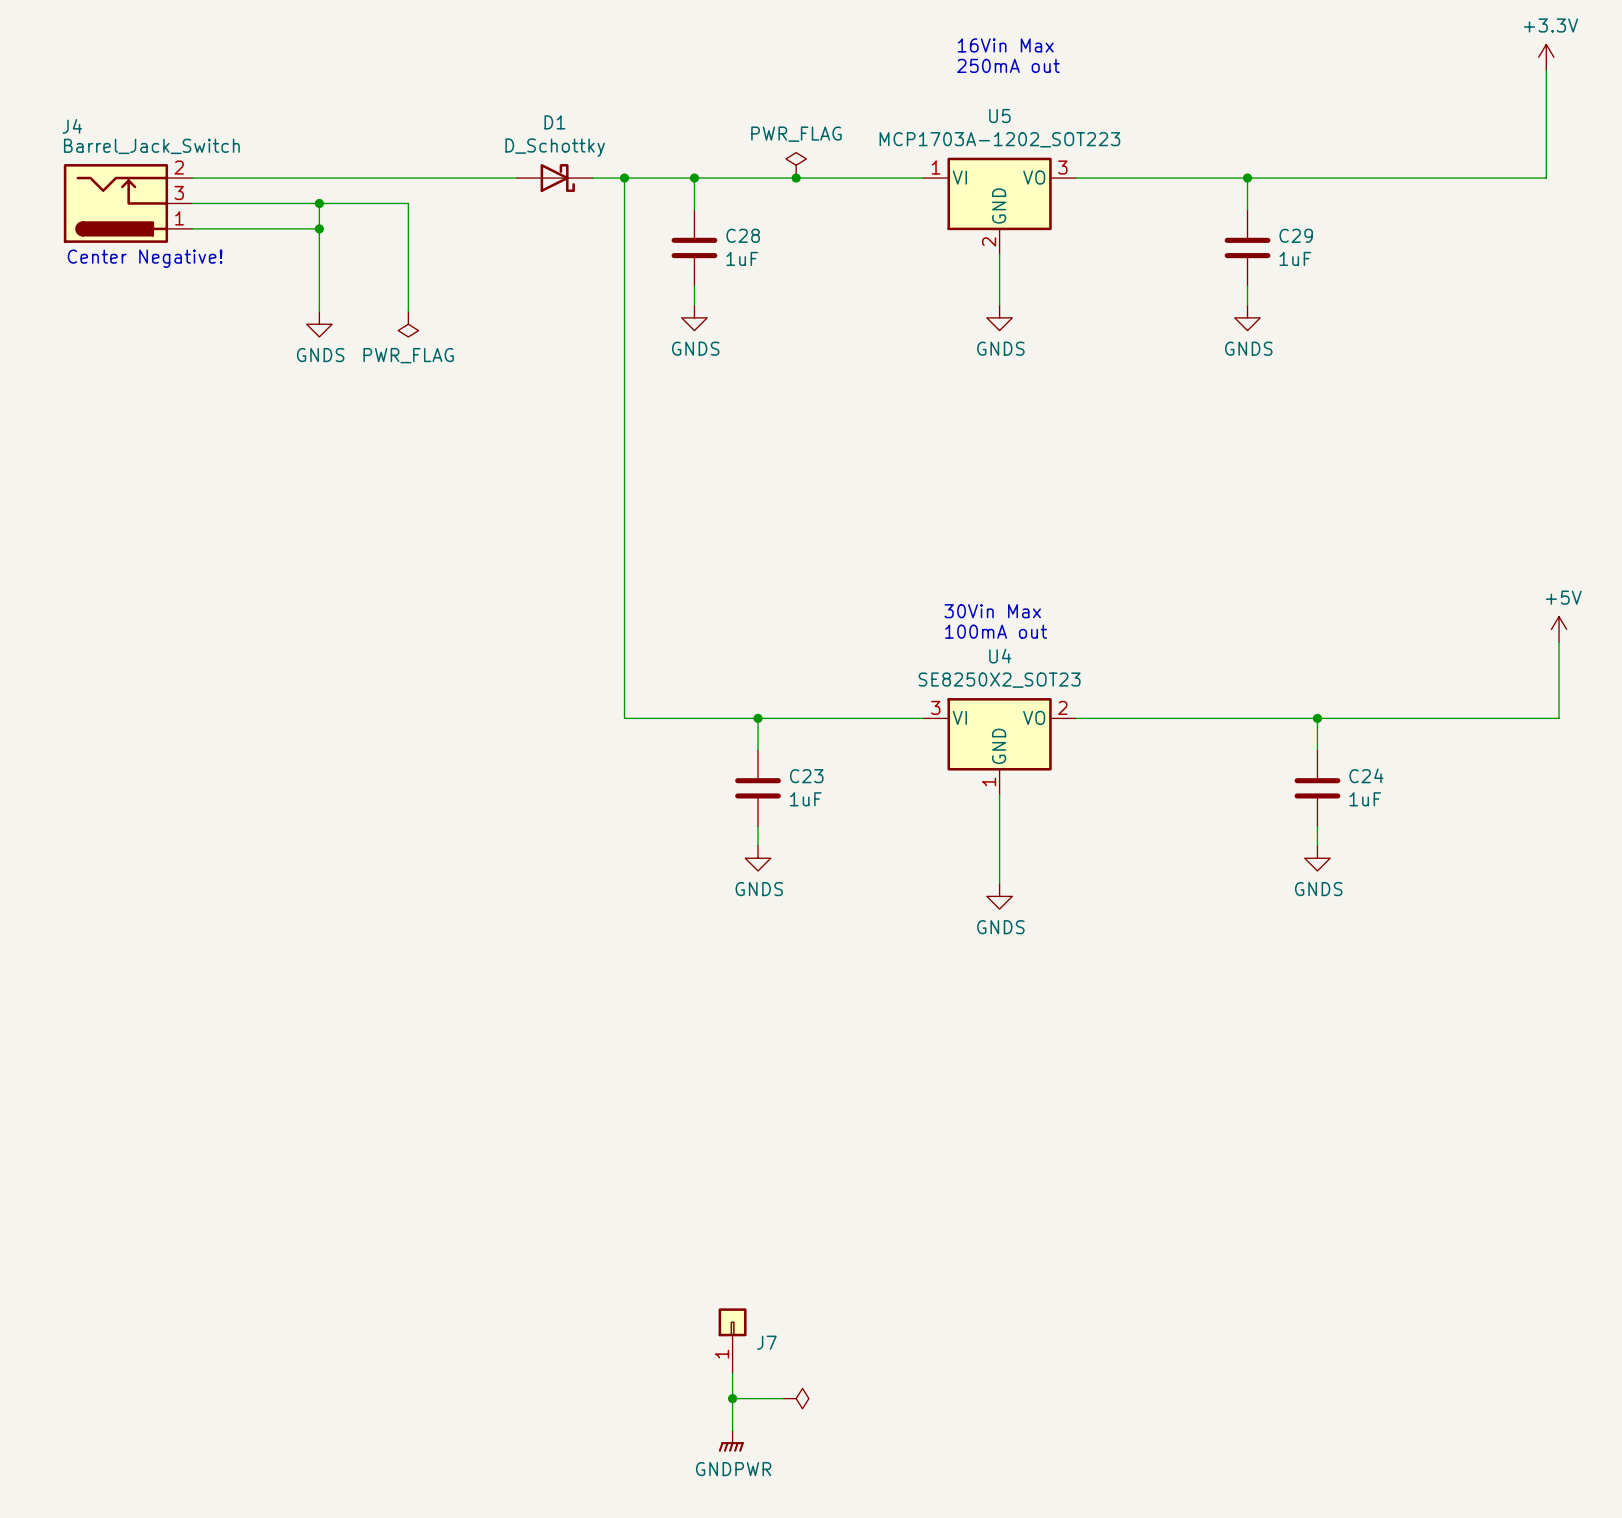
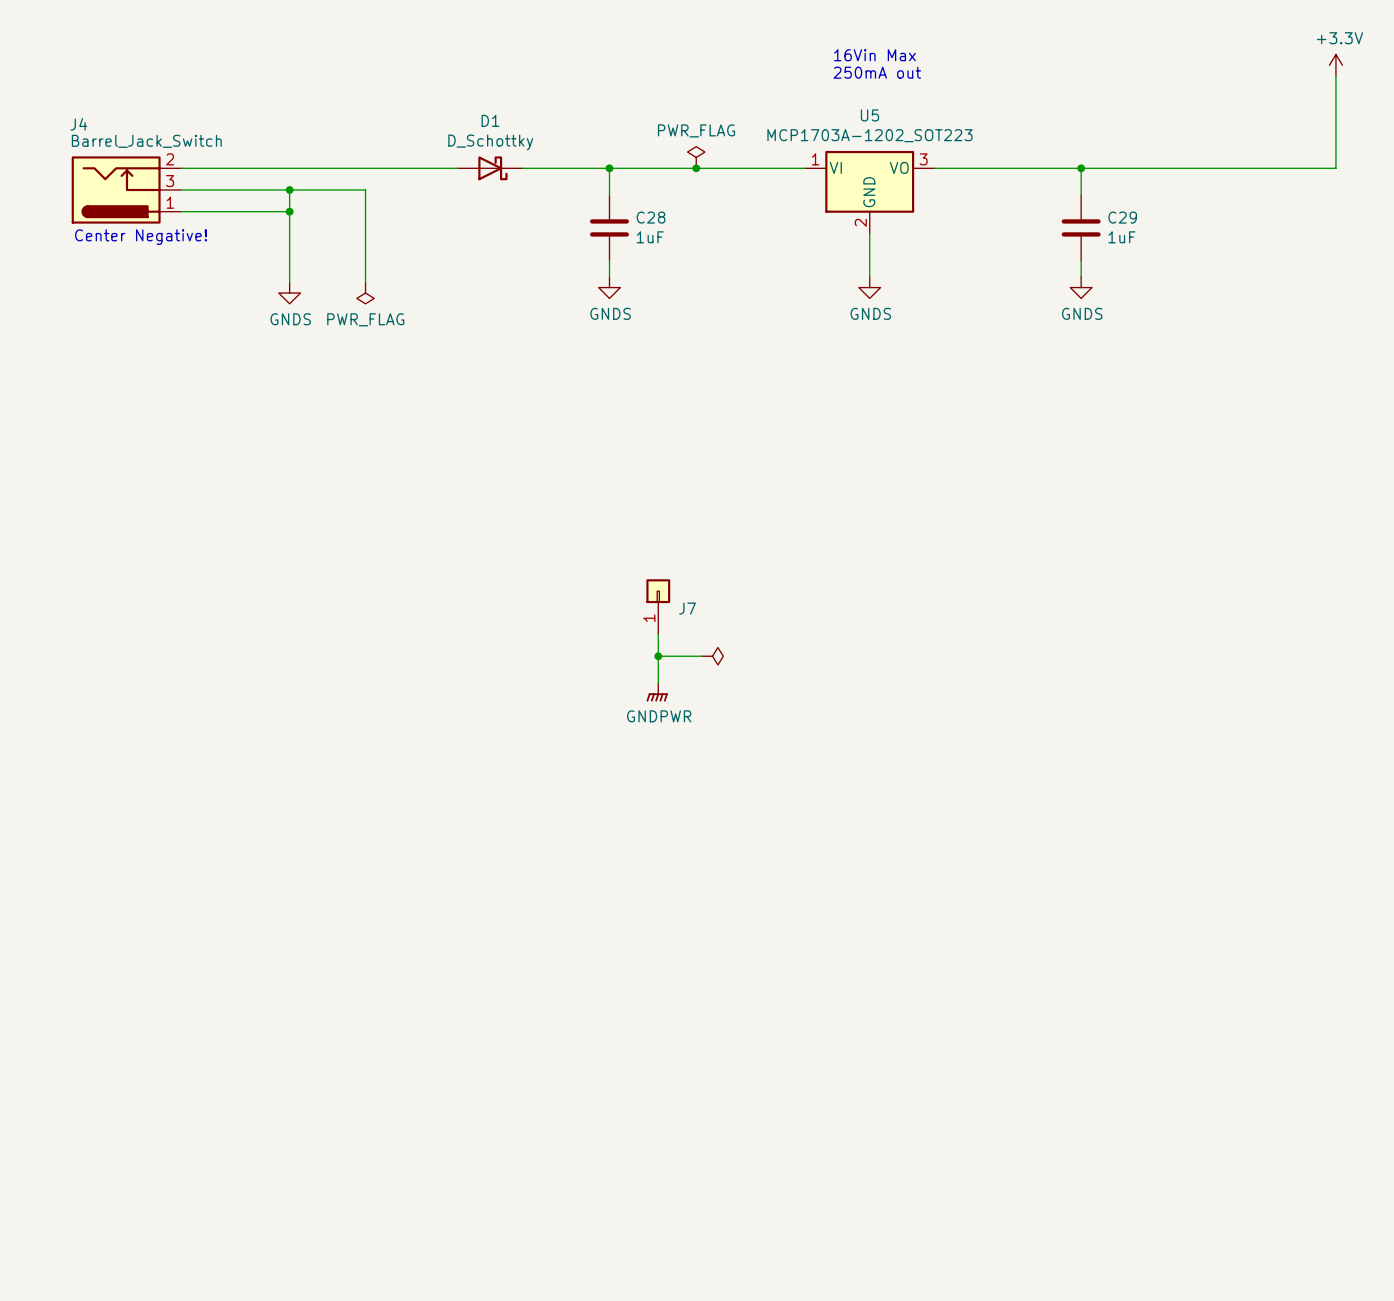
wire: (624, 178) (624, 718) (923, 718) -> none
junction: (624, 178) -> none
text: 30Vin Max (992, 611) -> none
power symbol: +5V (1559, 629) -> none
text: 100mA out (996, 631) -> none
wire: (1559, 642) (1559, 718) (1075, 718) -> none
wire: (758, 718) (758, 750) -> none
junction position: (758, 718) -> (658, 656)
wire: (1317, 718) (1317, 750) -> none
junction: (1317, 718) -> none
wire: none -> (658, 634) (658, 683)
U4: SE8250X2_SOT23 (999, 746) -> none
wire: none -> (658, 656) (701, 656)
power symbol: none -> (712, 656)
C23: 1uF (758, 788) -> none
C24: 1uF (1317, 788) -> none
power symbol: none -> GNDPWR (657, 692)
wire: (999, 794) (999, 883) -> none
wire: (758, 826) (758, 845) -> none
wire: (1317, 826) (1317, 845) -> none
power symbol: GNDS (758, 858) -> none
power symbol: GNDS (1317, 858) -> none
power symbol: GNDS (999, 896) -> none
J7 position: (732, 1340) -> (658, 606)
wire: (732, 1373) (732, 1430) -> none
wire: (732, 1398) (783, 1398) -> none
junction: (732, 1398) -> none
power symbol: (796, 1398) -> none
power symbol: GNDPWR (731, 1441) -> none

